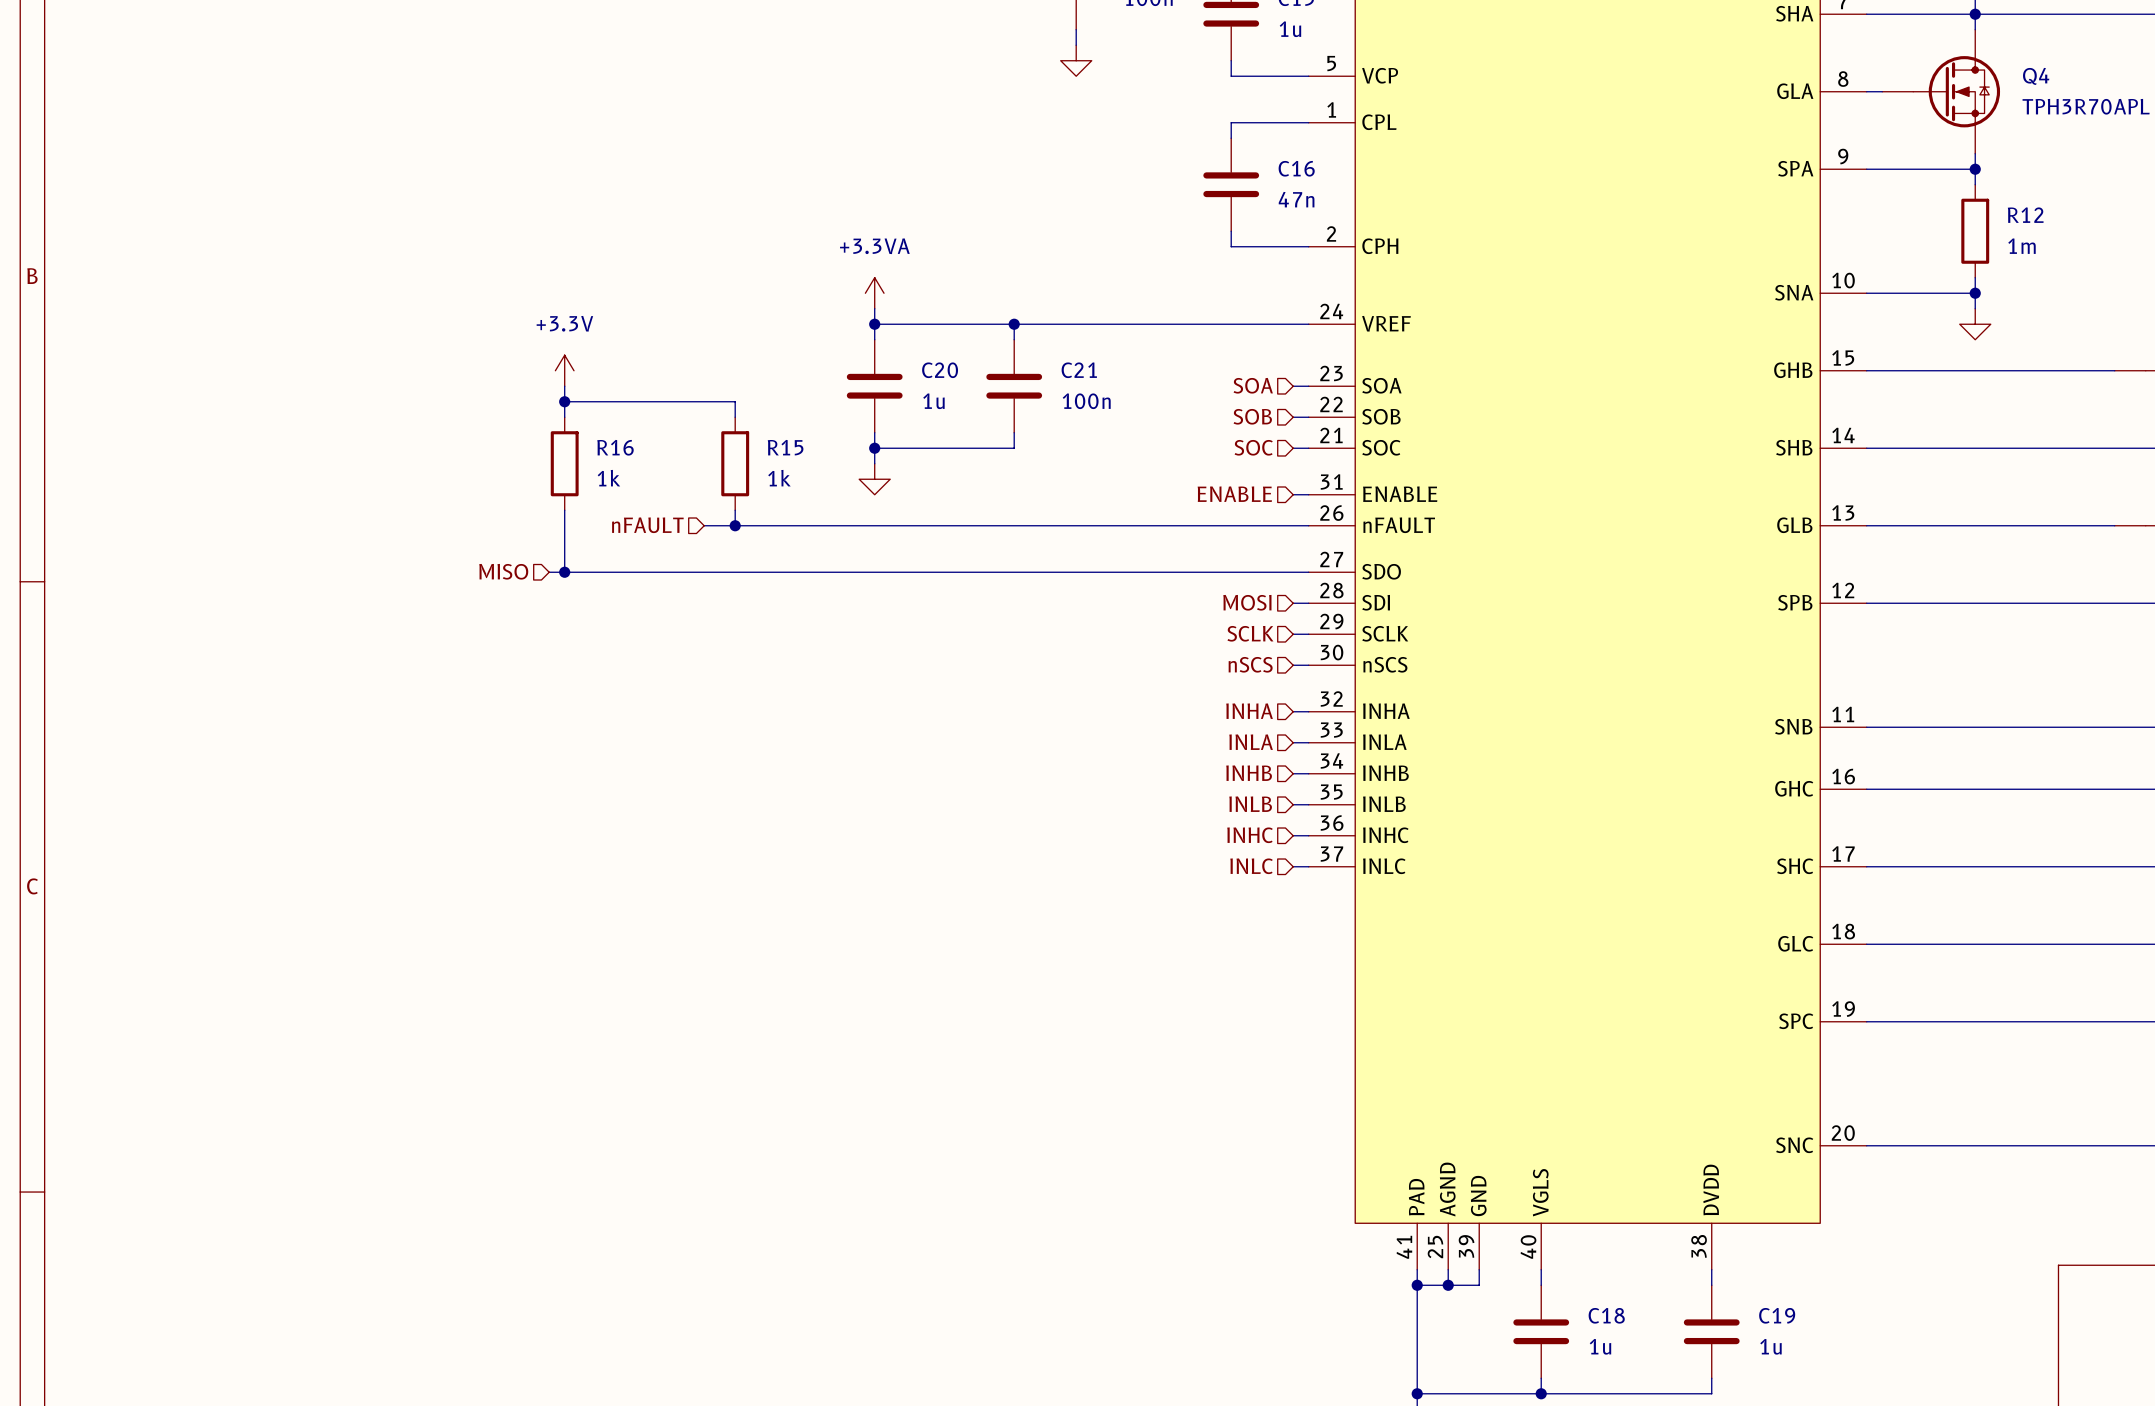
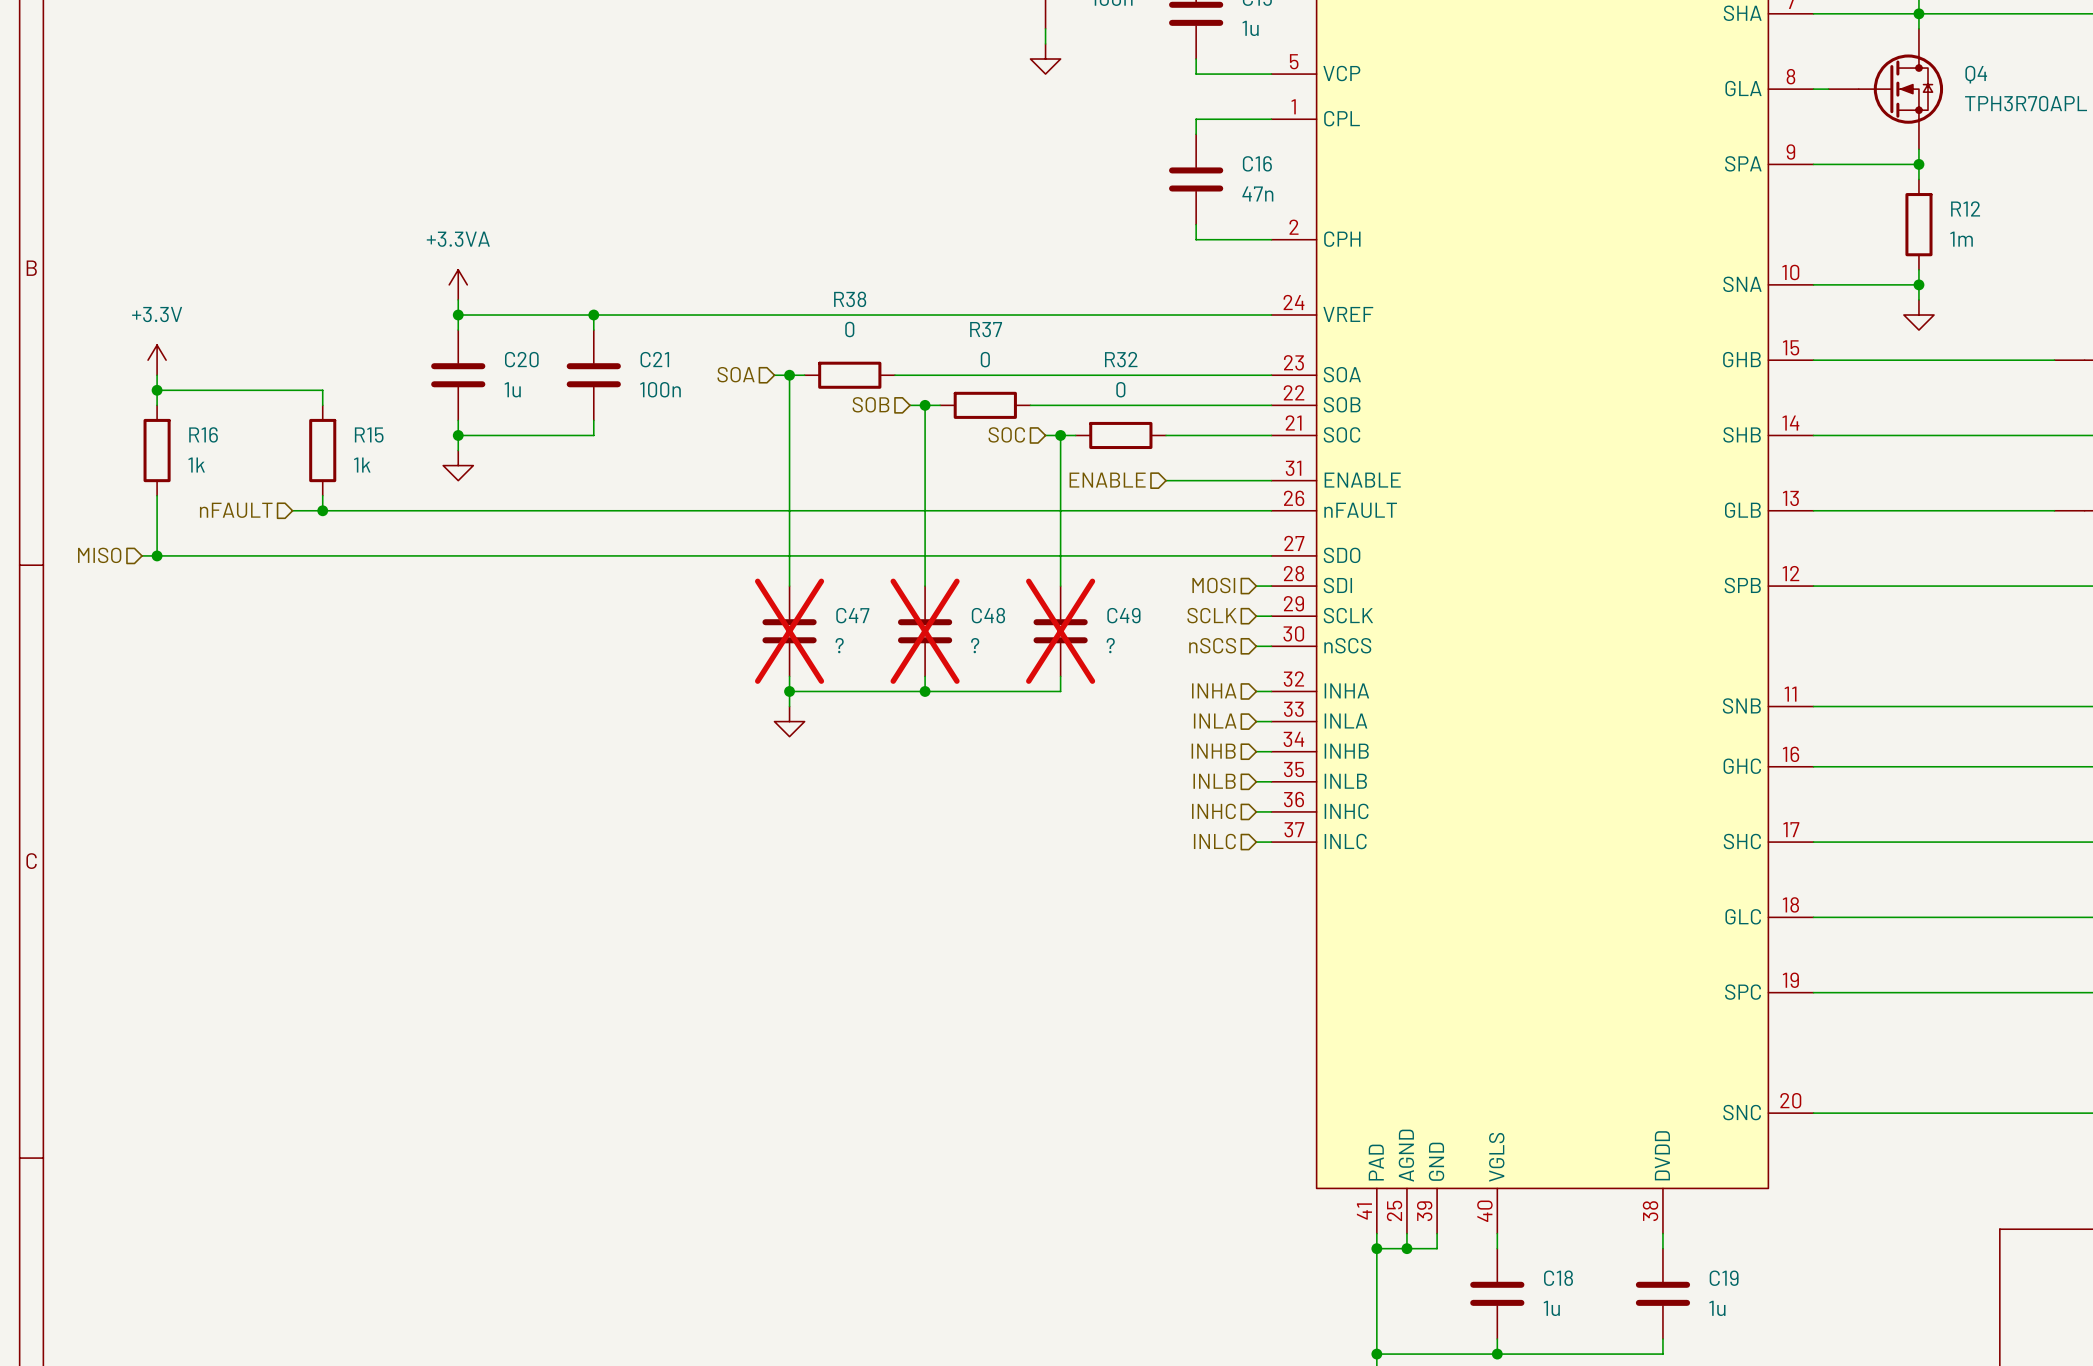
power symbol: none -> +3.3VA (458, 284)
power symbol: +3.3VA (874, 293) -> none
wire: none -> (458, 299) (458, 330)
wire: (874, 308) (874, 339) -> none
wire: none -> (458, 315) (849, 315)
junction: none -> (458, 315)
junction: none -> (593, 315)
junction: (874, 324) -> none
wire: (1014, 324) (1014, 339) -> none
junction: (1014, 324) -> none
power symbol: none -> +3.3V (157, 360)
power symbol: +3.3V (564, 370) -> none
hierarchical label: none -> SOA (736, 374)
hierarchical label: SOA (1253, 385) -> none
wire: none -> (157, 375) (157, 405)
wire: (564, 386) (564, 417) -> (458, 420) (458, 450)
wire: none -> (774, 375) (804, 375)
wire: none -> (789, 375) (789, 586)
junction: none -> (789, 375)
C20 position: (874, 386) -> (458, 375)
R38: none -> 0 (849, 375)
wire: none -> (894, 375) (1256, 375)
C21 position: (1014, 386) -> (593, 375)
wire: none -> (157, 390) (322, 390) (322, 405)
junction: none -> (157, 390)
wire: (564, 401) (735, 401) (735, 417) -> none
junction: (564, 401) -> none
hierarchical label: none -> SOB (870, 404)
hierarchical label: SOB (1252, 416) -> none
wire: none -> (910, 405) (940, 405)
wire: none -> (925, 405) (925, 586)
junction: none -> (925, 405)
R37: none -> 0 (985, 405)
wire: none -> (1030, 405) (1256, 405)
wire: none -> (593, 420) (593, 435) (458, 435)
wire: (874, 432) (874, 463) -> (789, 676) (789, 706)
wire: (1014, 432) (1014, 448) (874, 448) -> none
hierarchical label position: SOC (1253, 447) -> SOC (1006, 434)
junction: none -> (458, 435)
junction: (874, 448) -> none
wire: none -> (1045, 435) (1075, 435)
wire: none -> (1060, 435) (1060, 586)
junction: none -> (1060, 435)
R32: none -> 0 (1120, 435)
wire: none -> (1166, 435) (1256, 435)
R16 position: (564, 463) -> (157, 450)
R15 position: (735, 463) -> (322, 450)
power symbol: none -> (458, 465)
power symbol: (874, 479) -> none
wire: none -> (1166, 480) (1256, 480)
hierarchical label position: ENABLE (1234, 494) -> ENABLE (1107, 480)
wire: none -> (157, 495) (157, 555)
wire: none -> (322, 495) (322, 510)
wire: (564, 510) (564, 572) -> none
wire: (735, 510) (735, 525) -> (593, 315) (593, 330)
hierarchical label: none -> nFAULT (236, 510)
wire: none -> (292, 510) (684, 510)
junction: none -> (322, 510)
hierarchical label: nFAULT (647, 525) -> none
junction: (735, 525) -> none
hierarchical label: none -> MISO (99, 555)
hierarchical label: MISO (503, 571) -> none
wire: none -> (142, 555) (533, 555)
junction: none -> (157, 555)
junction: (564, 572) -> none
C47: none -> ? (789, 631)
C48: none -> ? (925, 631)
C49: none -> ? (1060, 631)
wire: none -> (925, 676) (925, 691)
wire: none -> (1060, 676) (1060, 691) (789, 691)
junction: none -> (789, 691)
junction: none -> (925, 691)
power symbol: none -> (789, 721)

